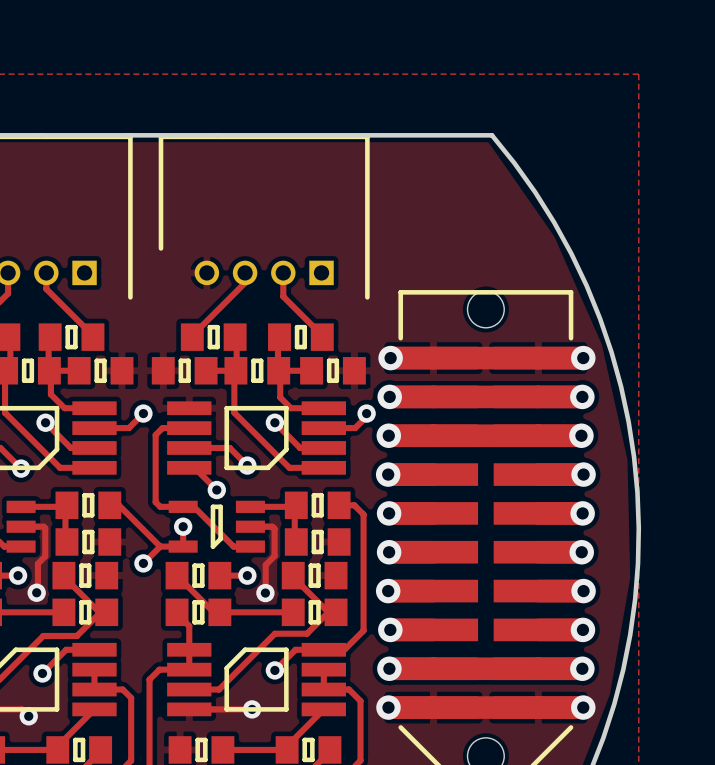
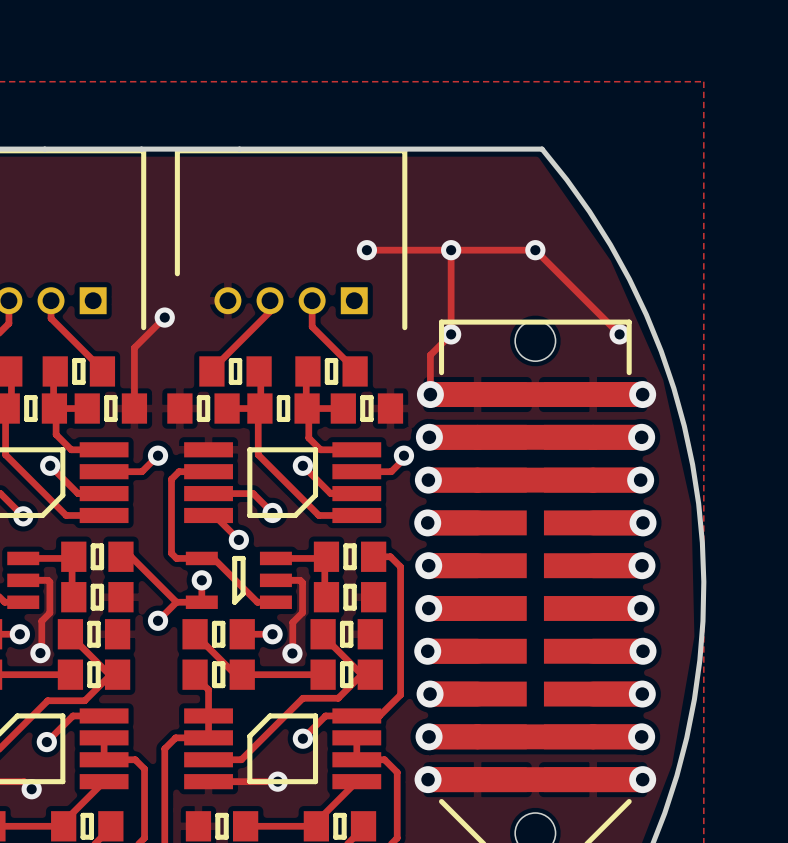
track: none -> (366, 250) (535, 250) (619, 334)
via: none -> (366, 250)
track: none -> (451, 250) (451, 334) (430, 355) (430, 394)
via: none -> (451, 250)
via: none -> (535, 250)
track: none -> (164, 317) (134, 347) (134, 408)
via: none -> (164, 317)
via: none -> (451, 334)
via: none -> (619, 334)

